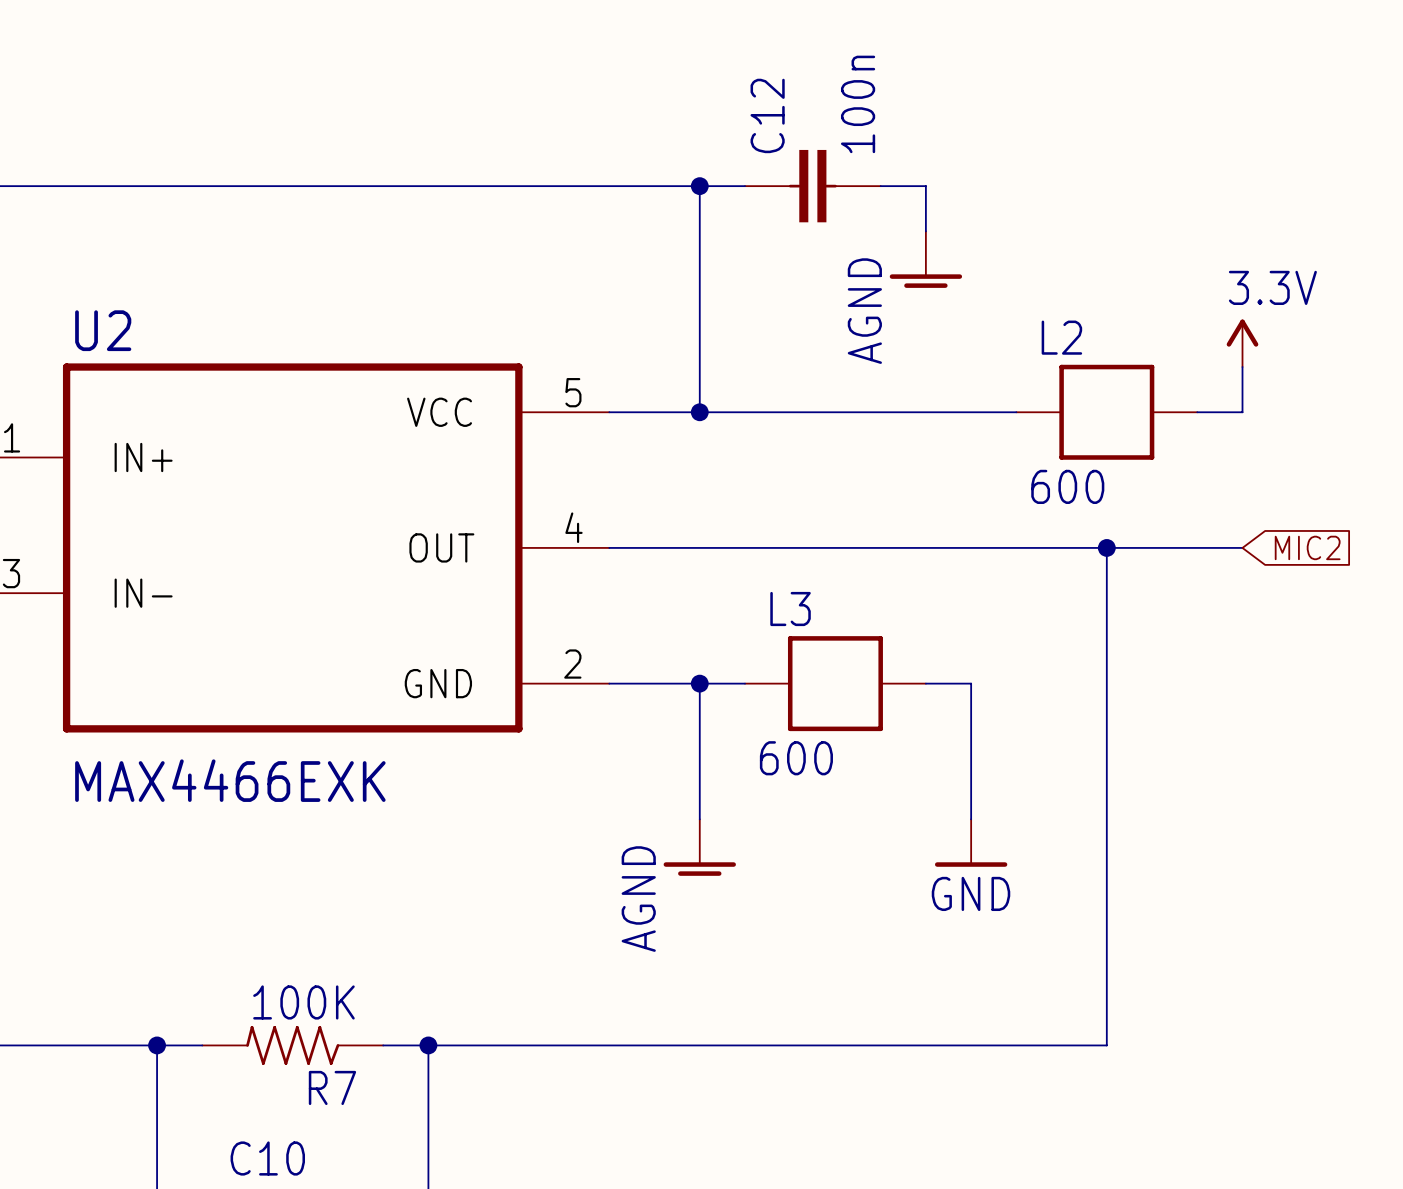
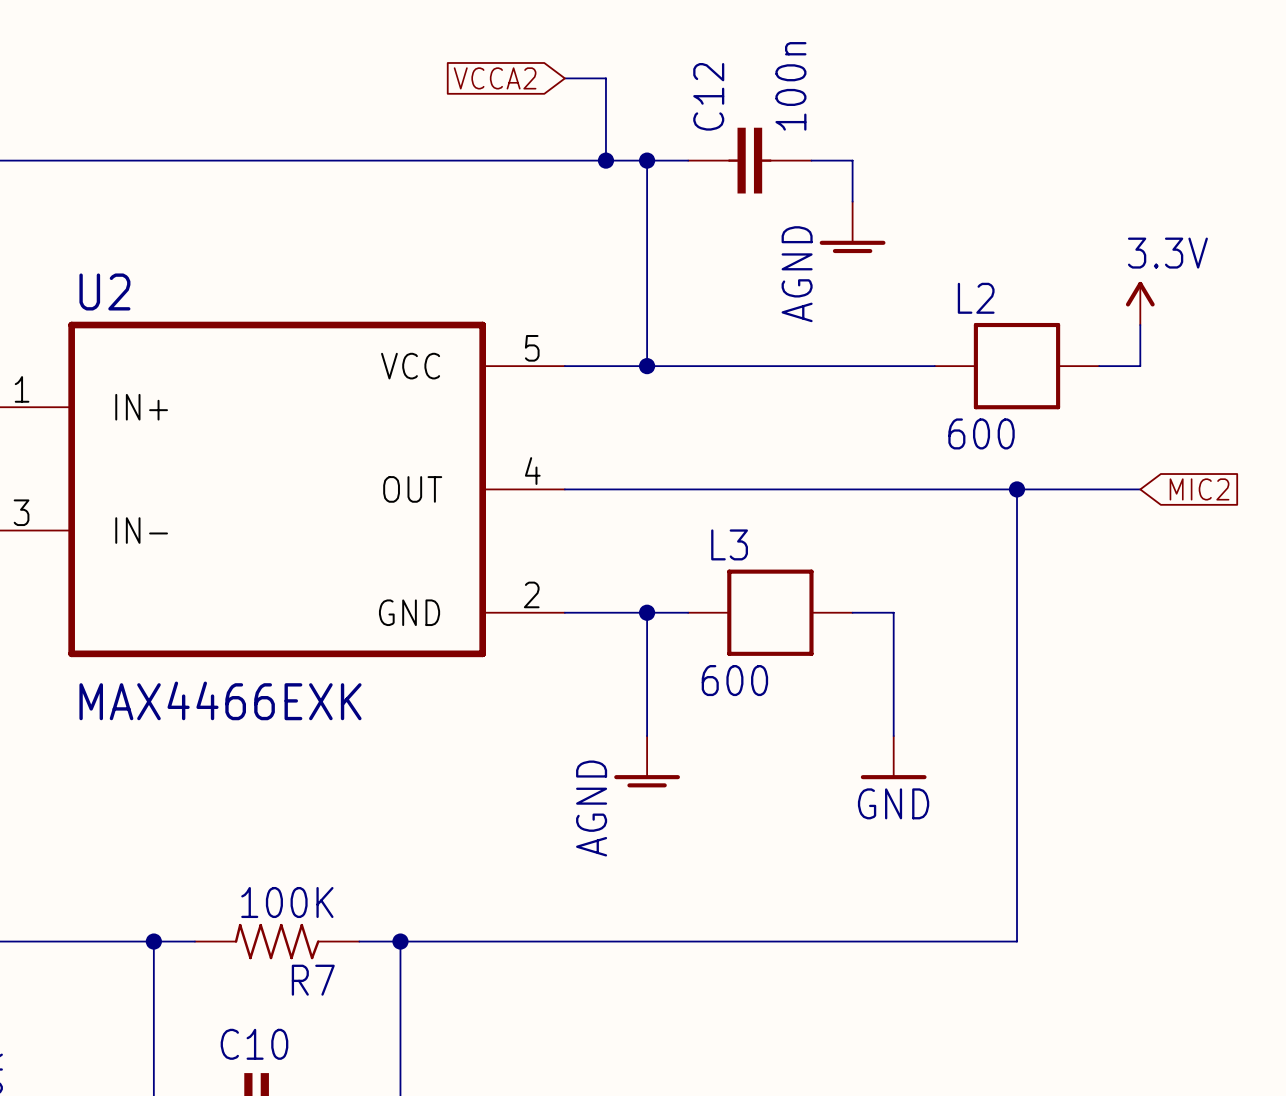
global label: none -> VCCA2 (495, 78)
wire: none -> (564, 78) (605, 78) (605, 160)
junction: none -> (605, 160)

